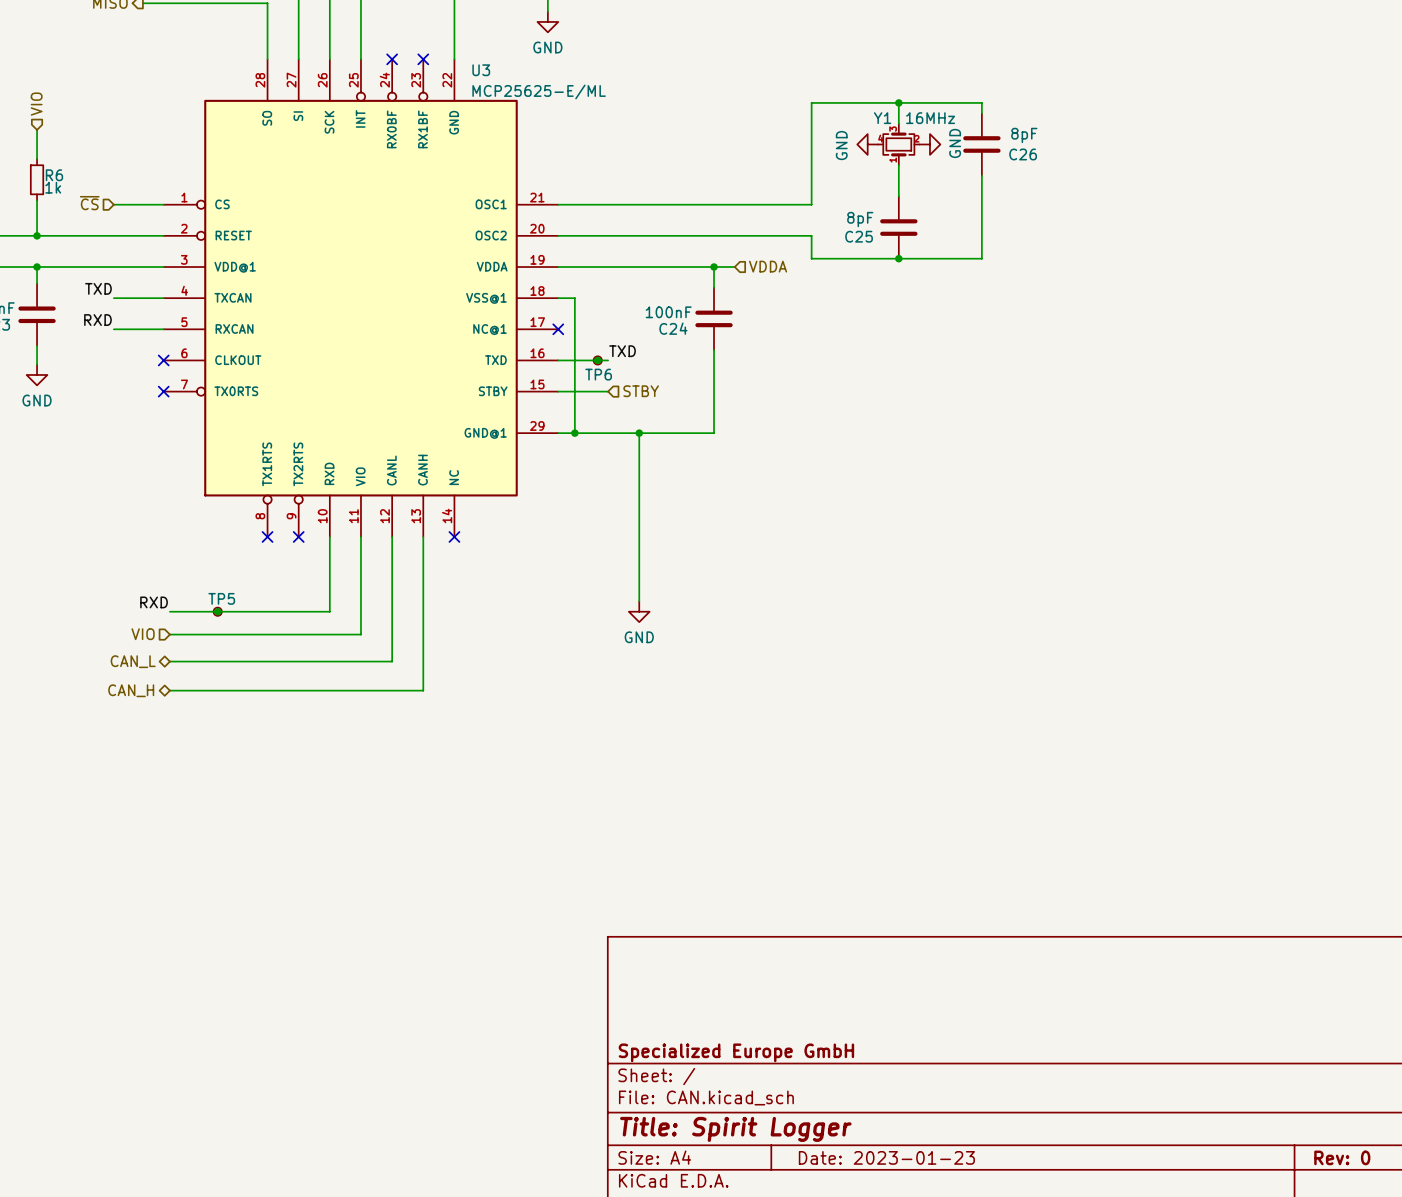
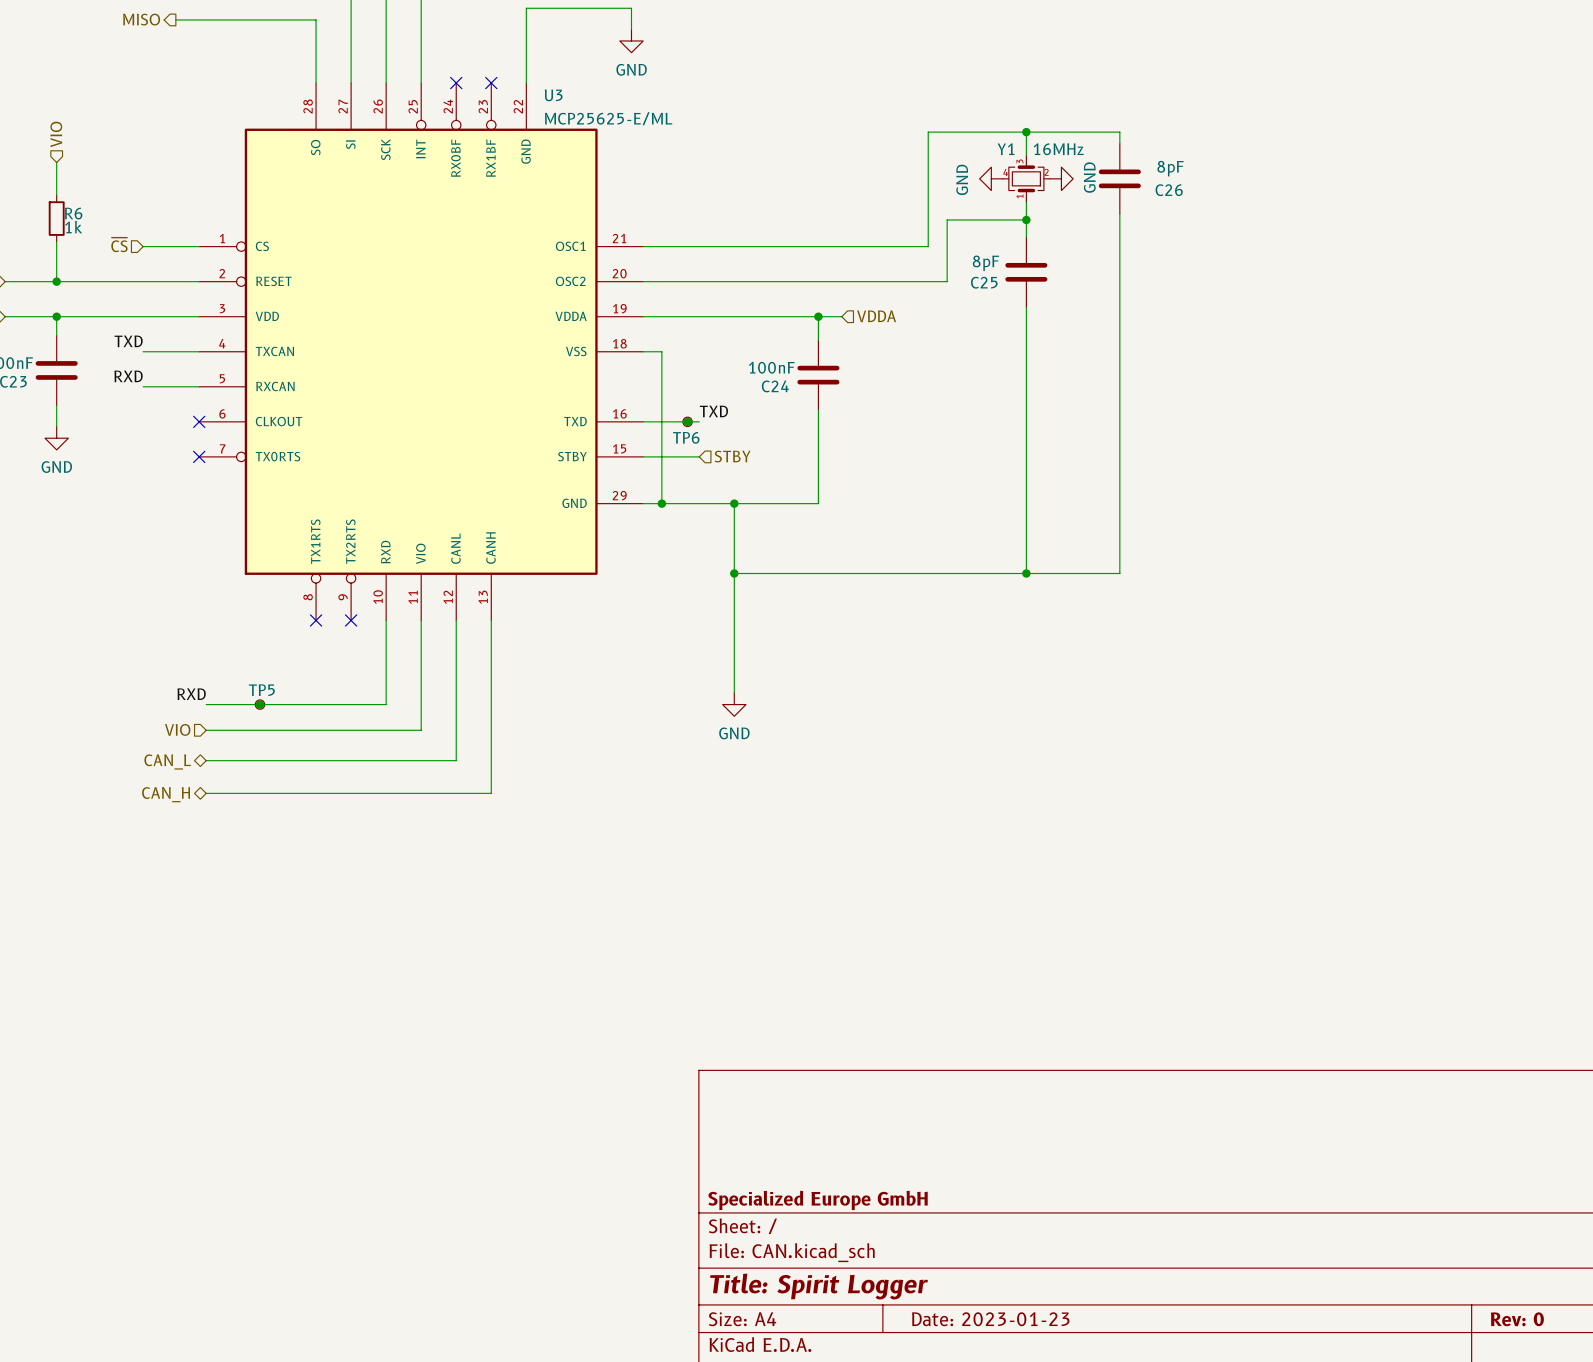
U3 symbol: [163, 59, 559, 537] -> [199, 83, 644, 621]
junction: none -> (1026, 219)
wire: (811, 235) (811, 258) (981, 258) -> (928, 281) (947, 281) (947, 219) (1026, 219)
wire: none -> (1026, 307) (1026, 573)
junction: (898, 258) -> none
wire: none -> (1119, 307) (1119, 573) (734, 573)
no-connect mark: (558, 329) -> none
junction: none -> (734, 573)
junction: none -> (1026, 573)
no-connect mark: (454, 536) -> none

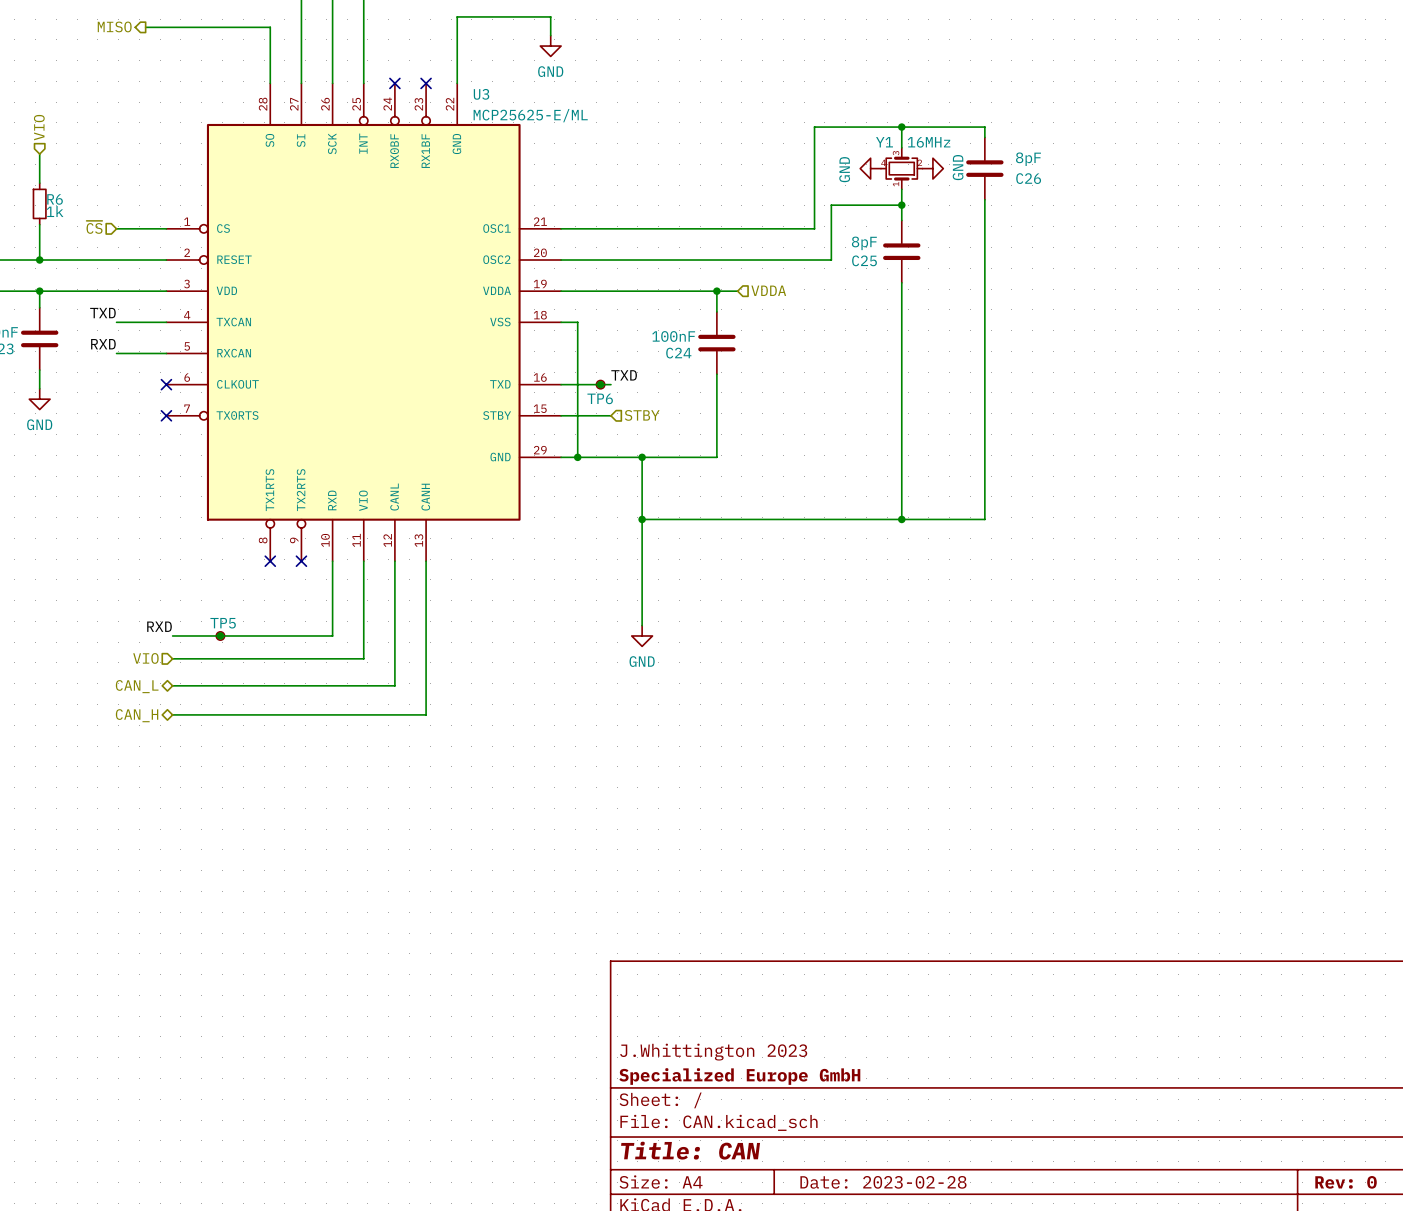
title block: none -> J.Whittington 2023 (713, 1052)
title block: Title: Spirit Logger (819, 1286) -> Title: CAN (690, 1150)
title block: Date: 2023-01-23 (990, 1319) -> Date: 2023-02-28 (883, 1182)

